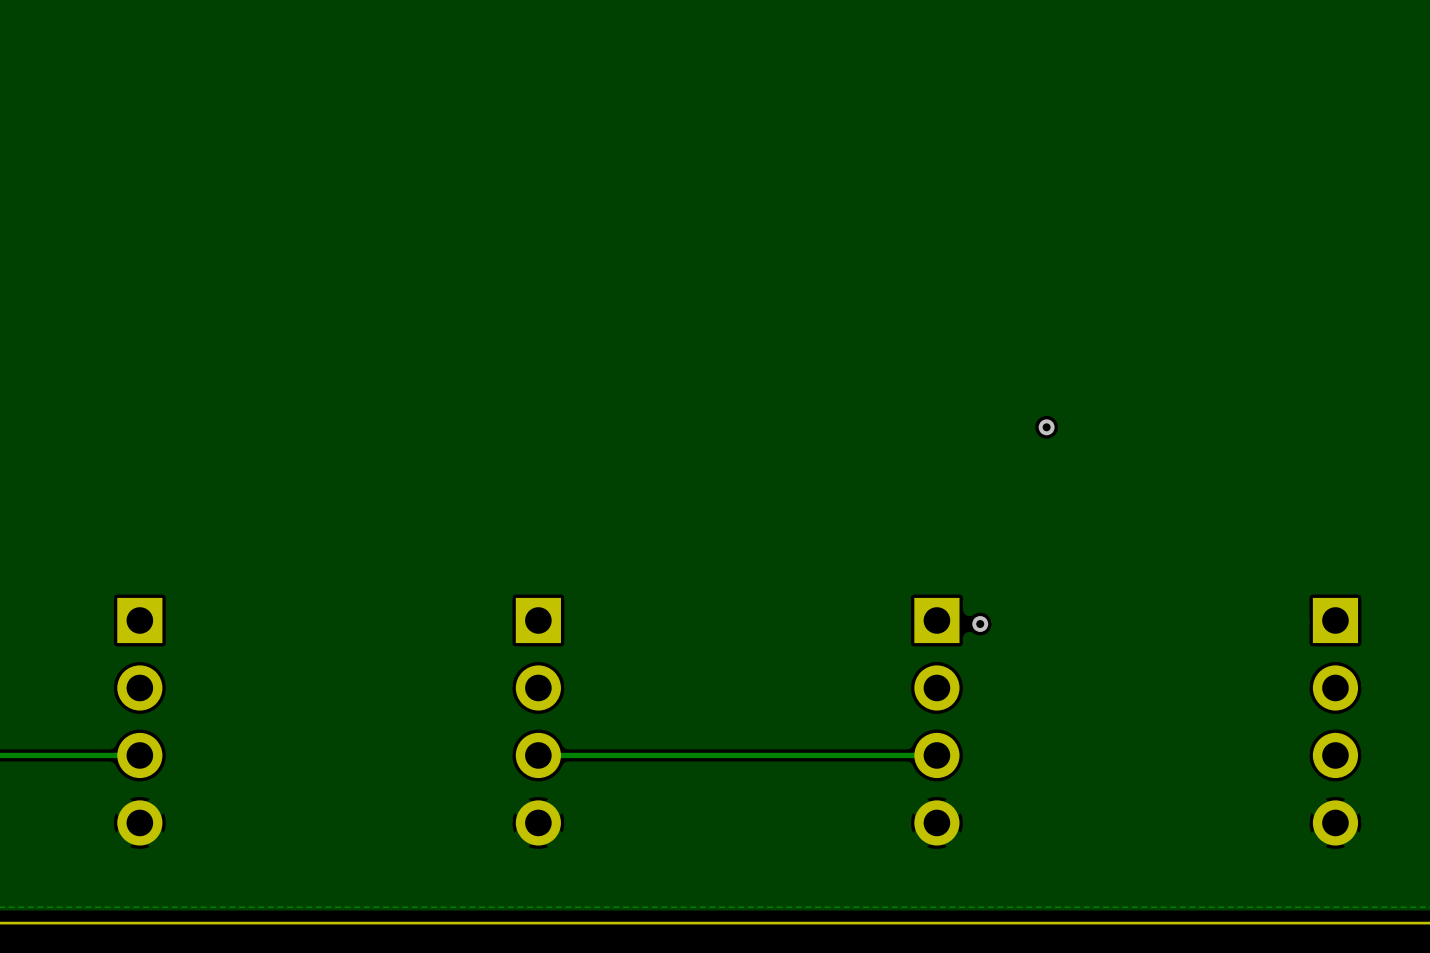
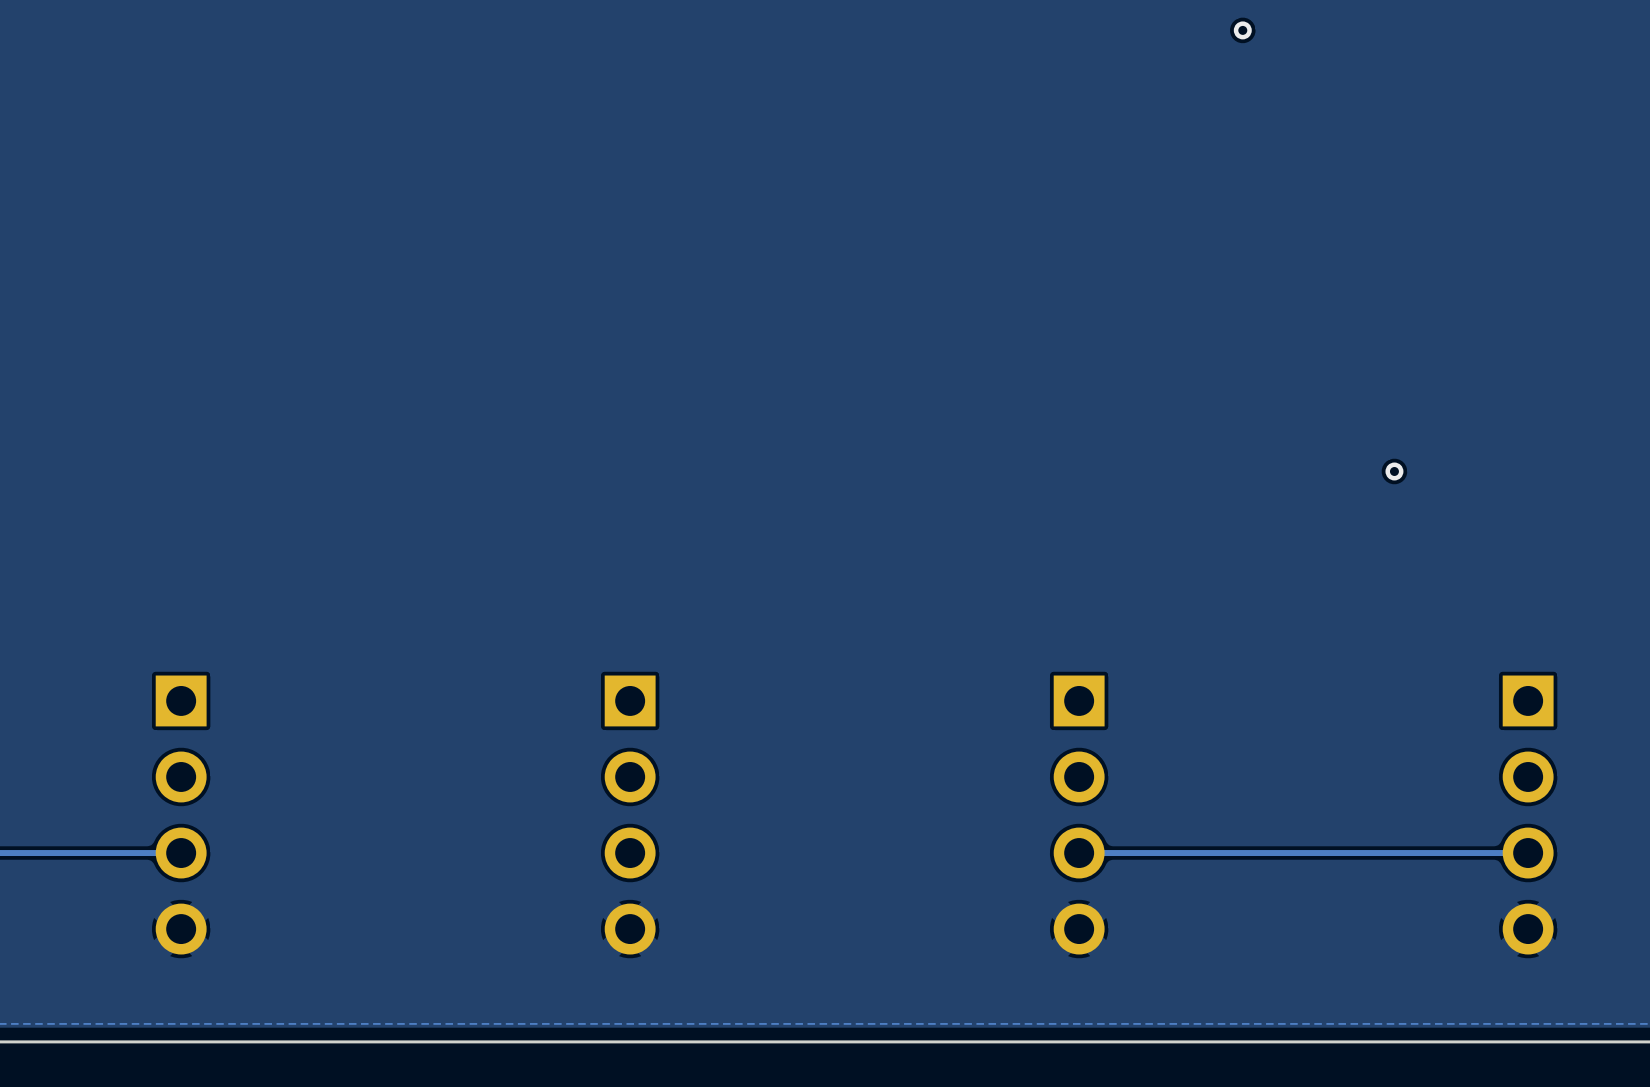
via: none -> (1242, 30)
via: none -> (1394, 471)
via: (1046, 427) -> none
via: (980, 624) -> none
track: (936, 755) (538, 755) -> (1079, 853) (1528, 853)

